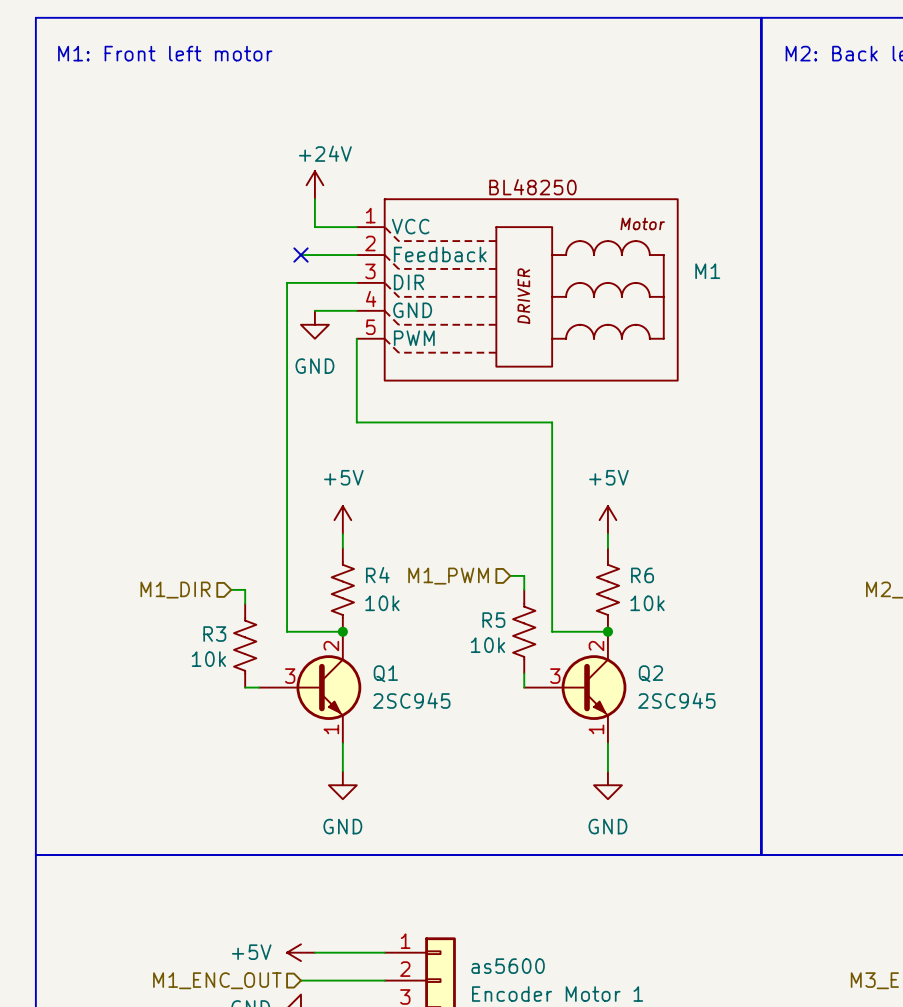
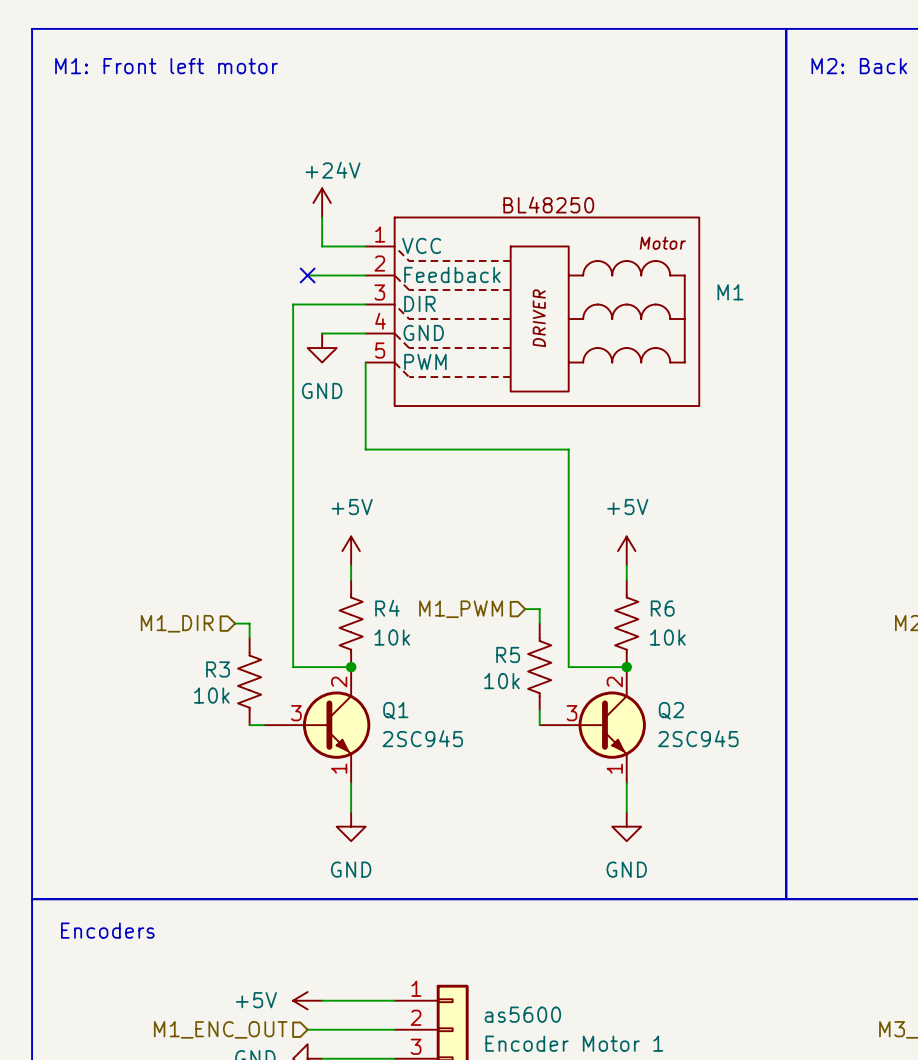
text: none -> Encoders (107, 930)

